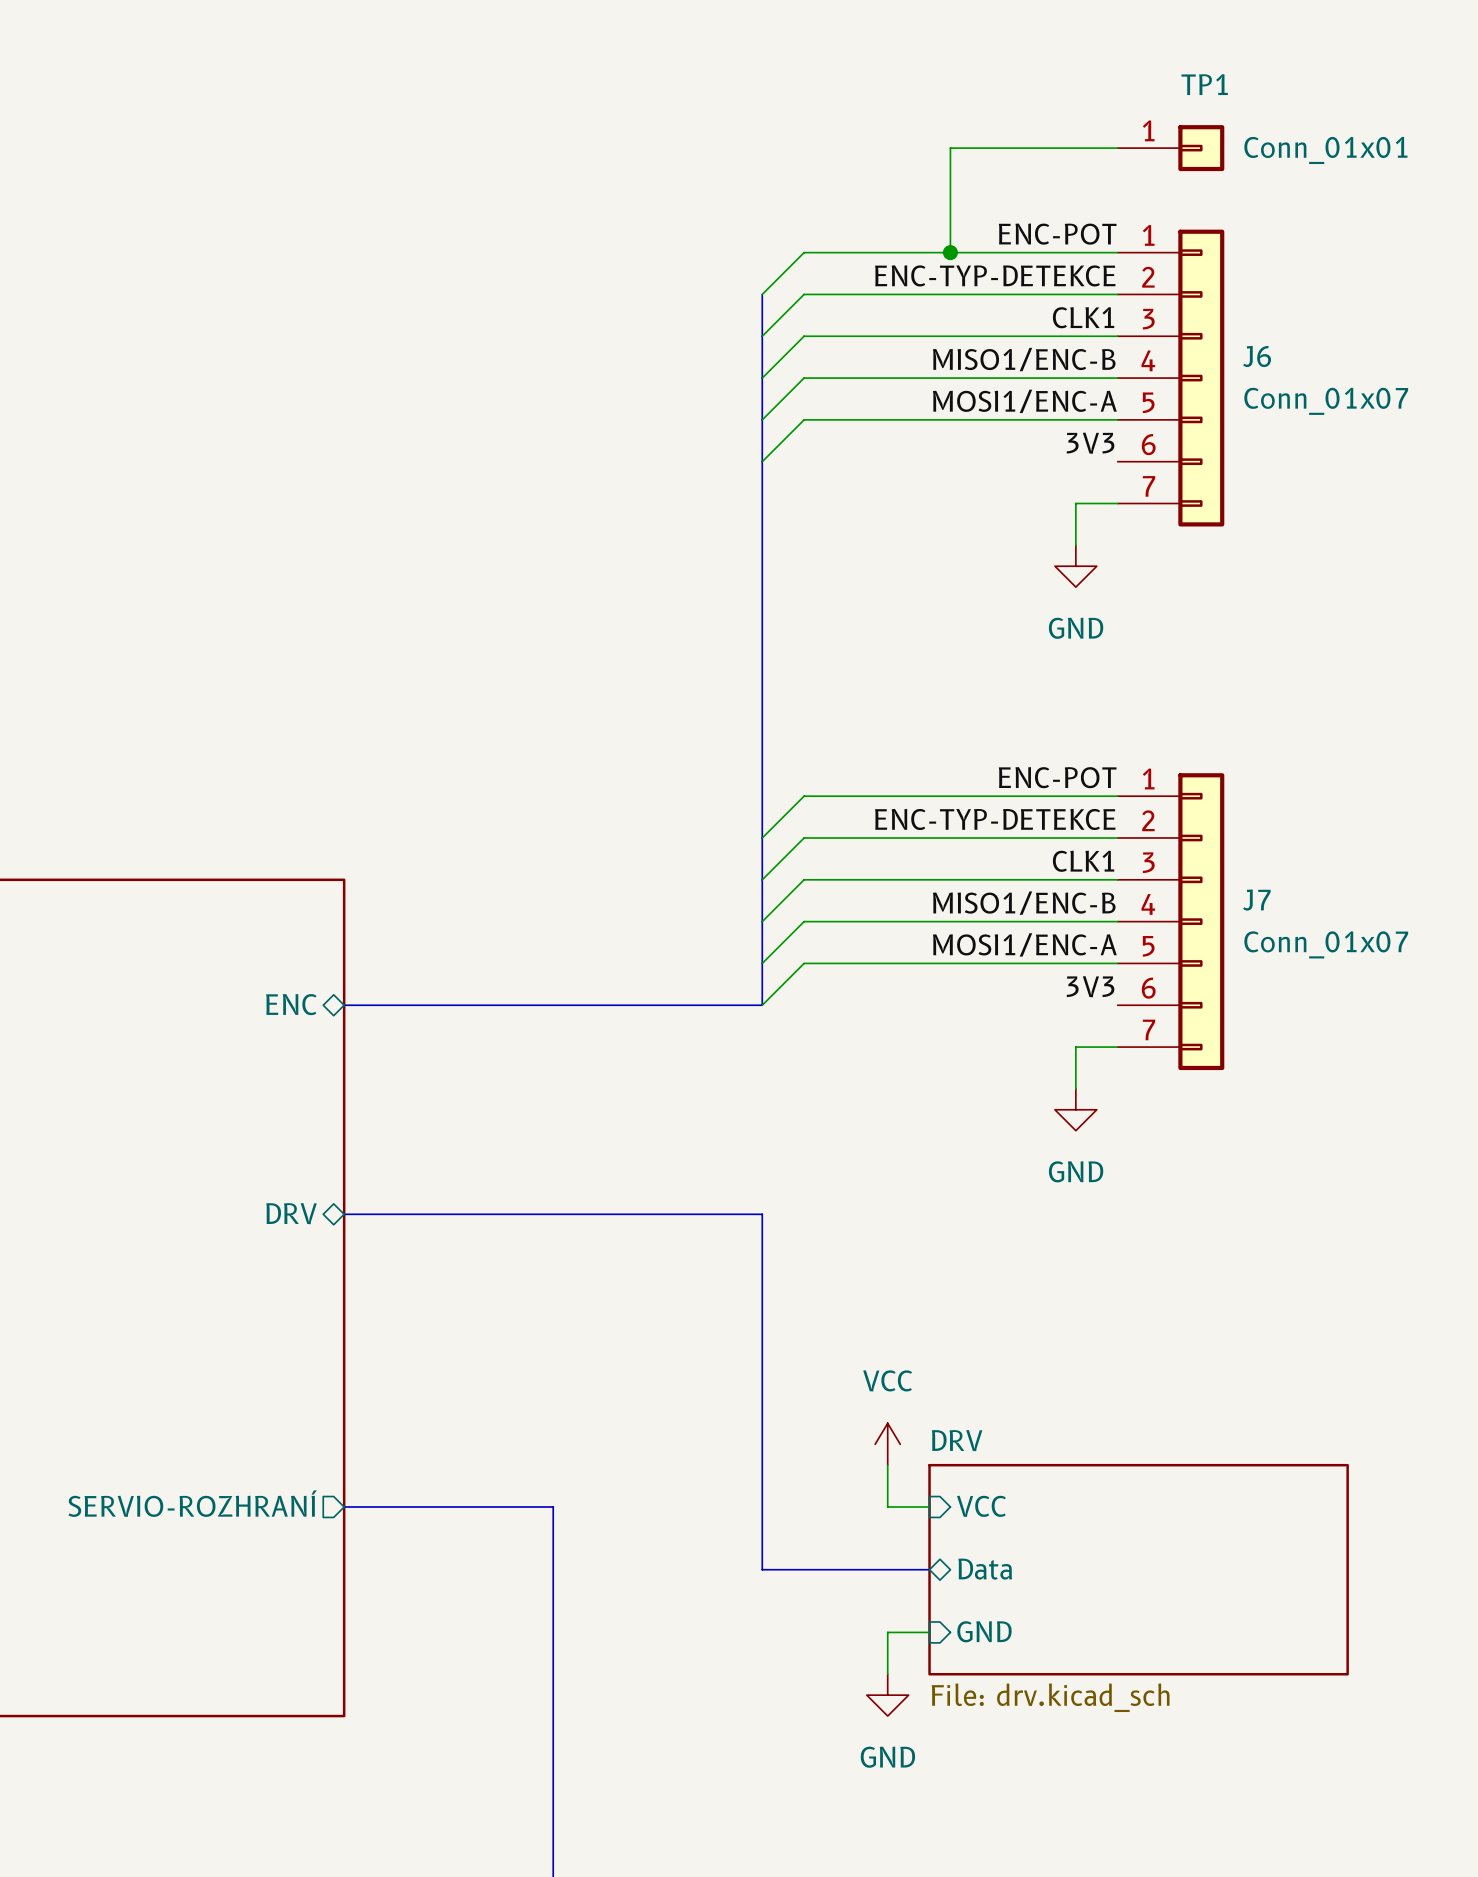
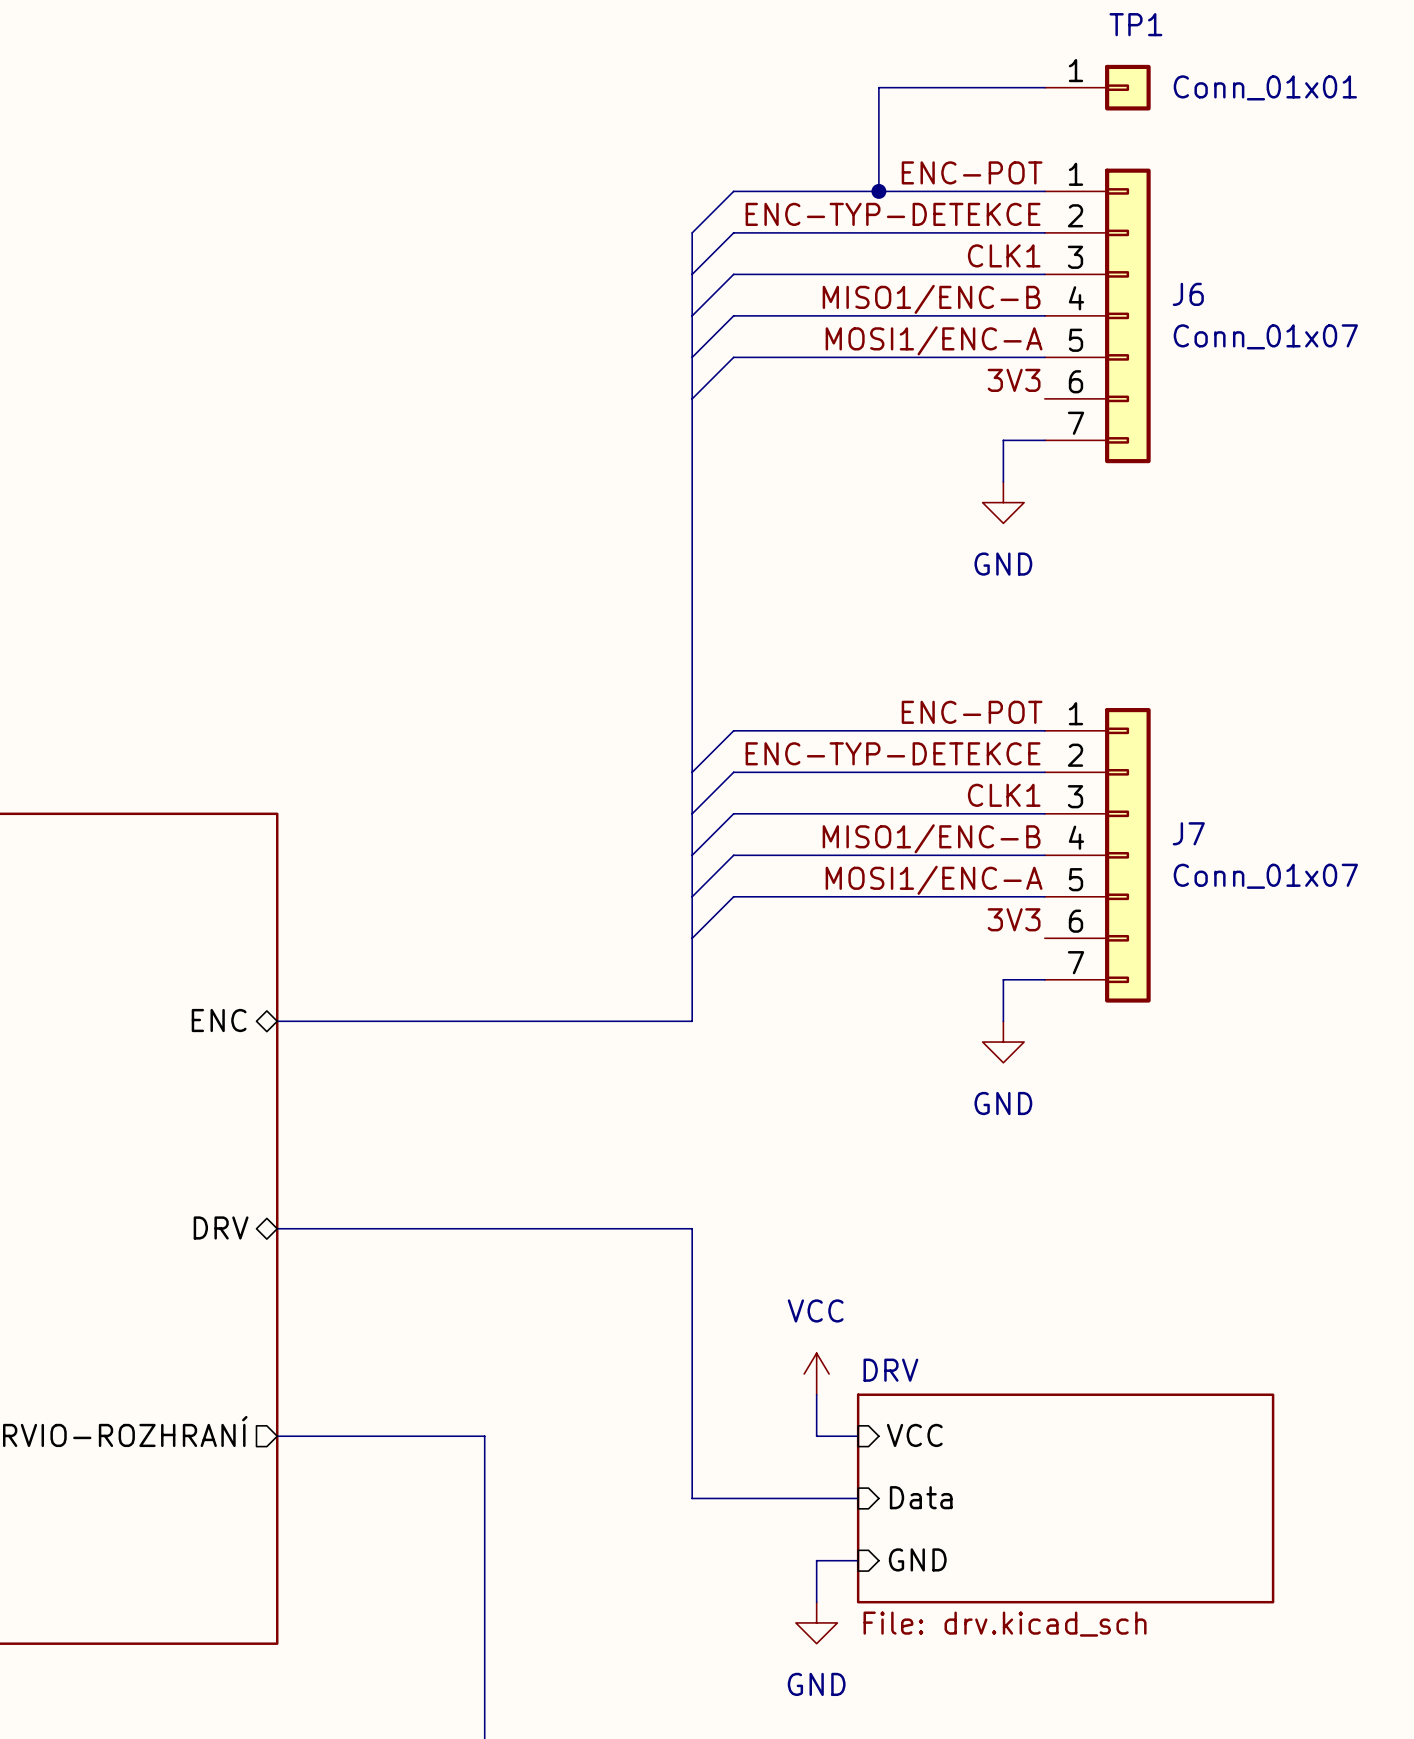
sheet pin position: ENC (291, 1004) -> ENC (219, 1020)
bus: (344, 1005) (762, 1005) -> (277, 1021) (692, 1021) (692, 938)
sheet pin position: DRV (291, 1213) -> DRV (221, 1227)
bus: (344, 1214) (762, 1214) (762, 1297) -> (277, 1228) (692, 1228)
sheet pin shape: bidirectional (985, 1569) -> input (921, 1497)

